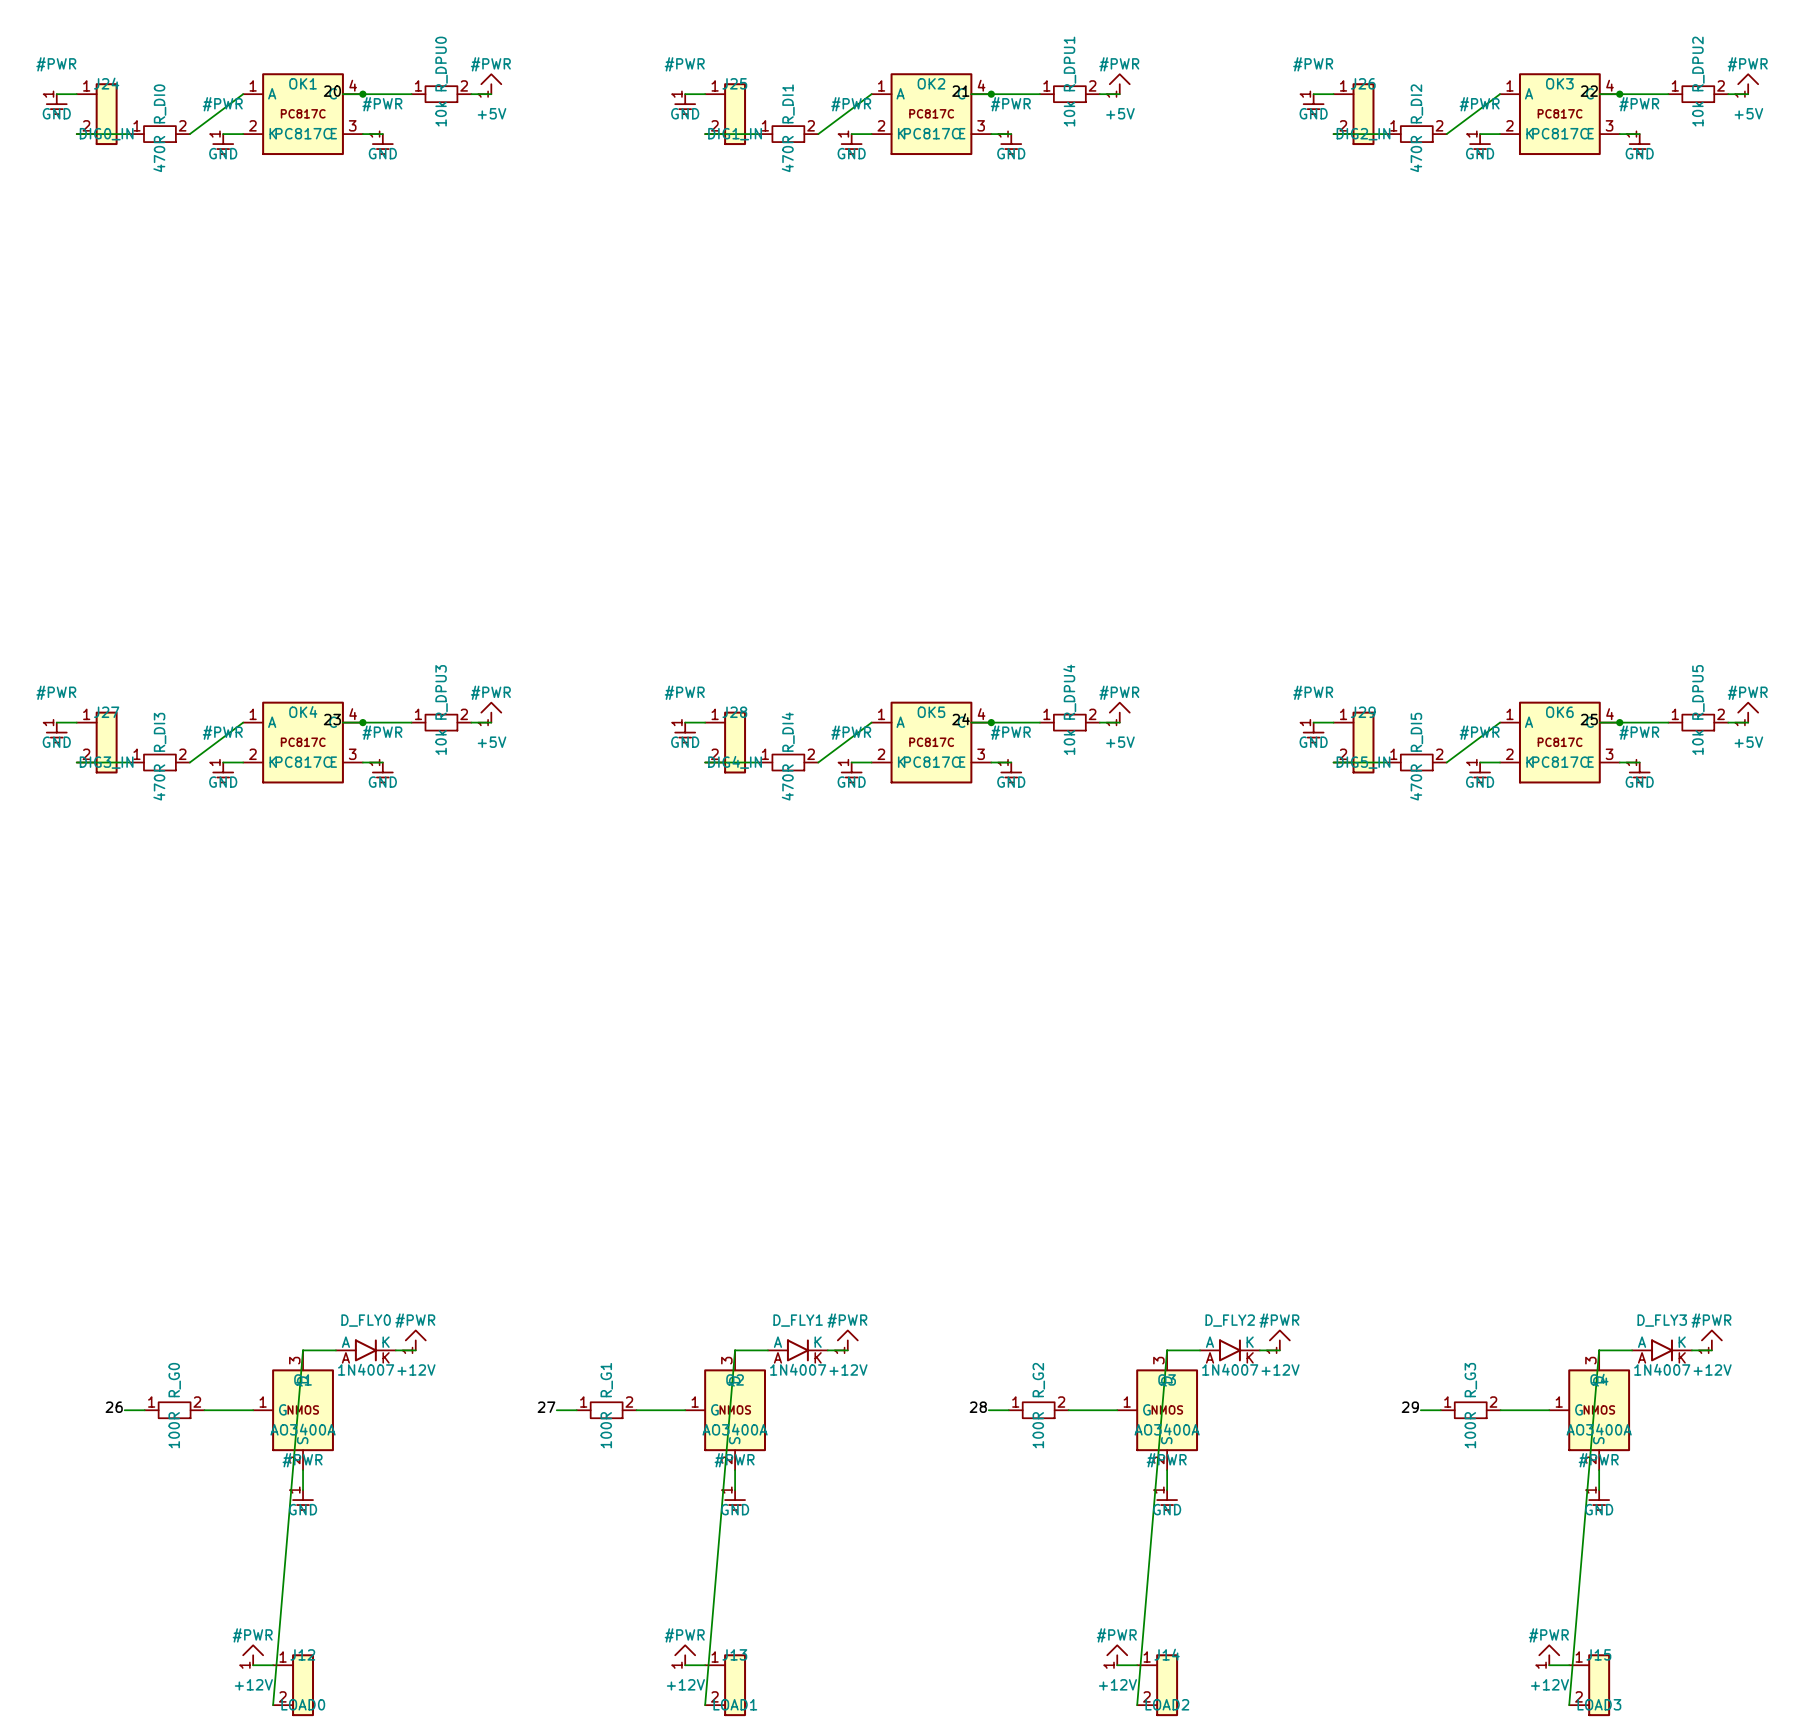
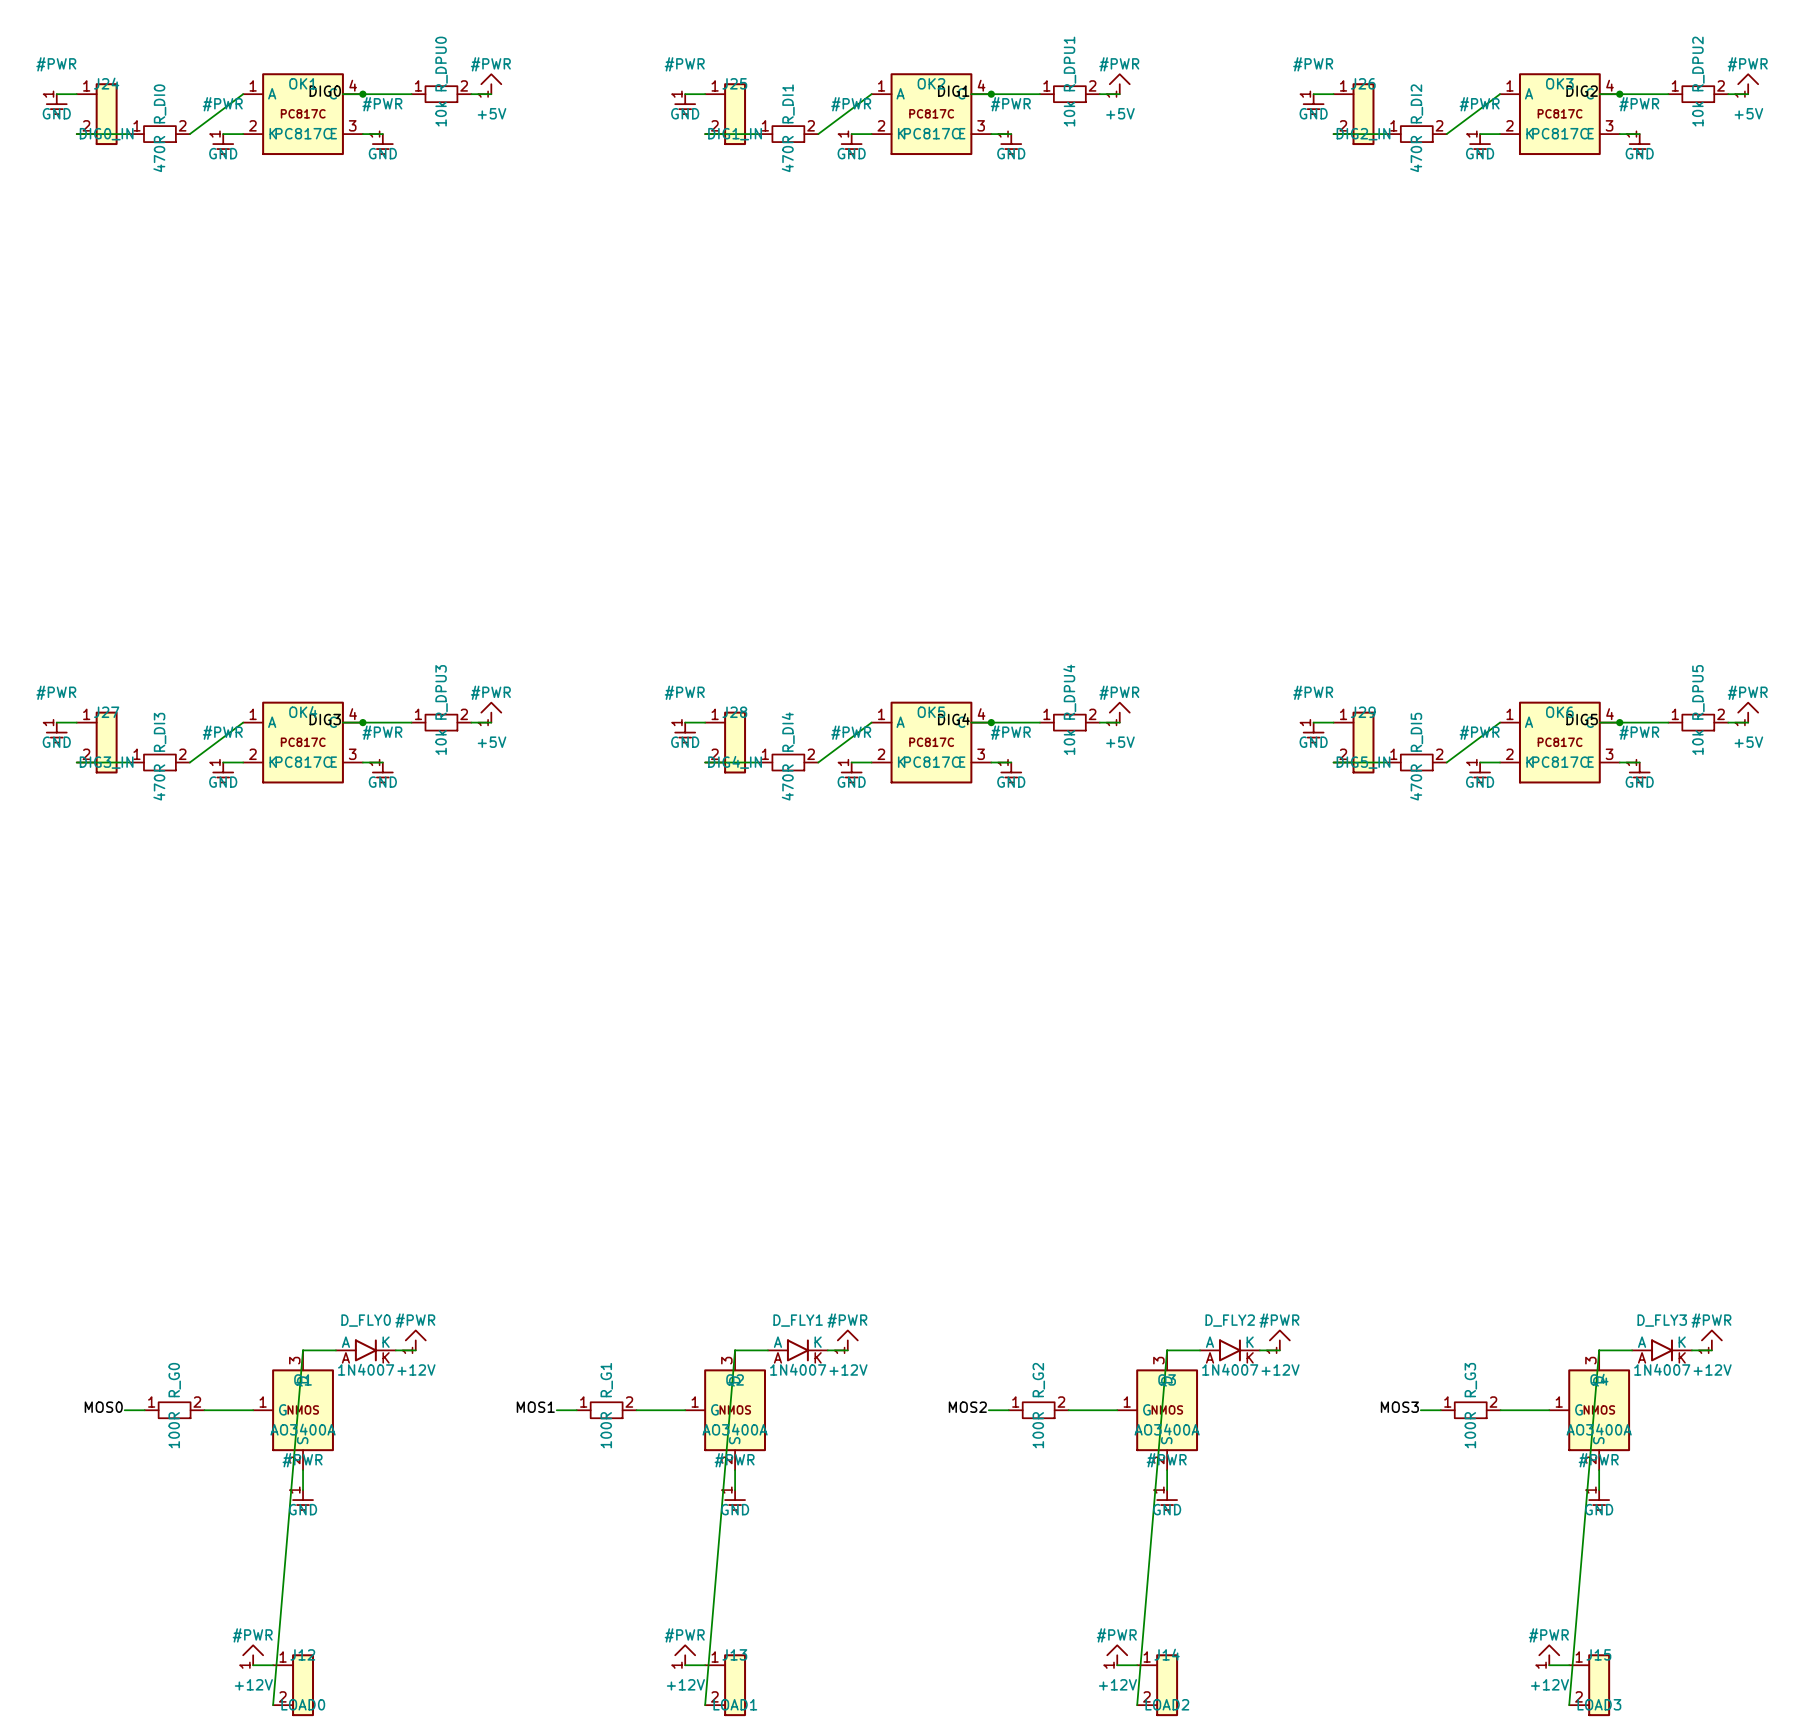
label: 20 (332, 91) -> DIG0 (325, 91)
label: 21 (960, 91) -> DIG1 (953, 91)
label: 22 (1589, 91) -> DIG2 (1582, 91)
label: 23 (332, 719) -> DIG3 (325, 719)
label: 24 (961, 719) -> DIG4 (953, 719)
label: 25 (1589, 719) -> DIG5 (1582, 719)
label: 26 (114, 1407) -> MOS0 (103, 1407)
label: 27 (546, 1407) -> MOS1 (535, 1407)
label: 28 (978, 1407) -> MOS2 (967, 1407)
label: 29 (1410, 1407) -> MOS3 (1399, 1407)

